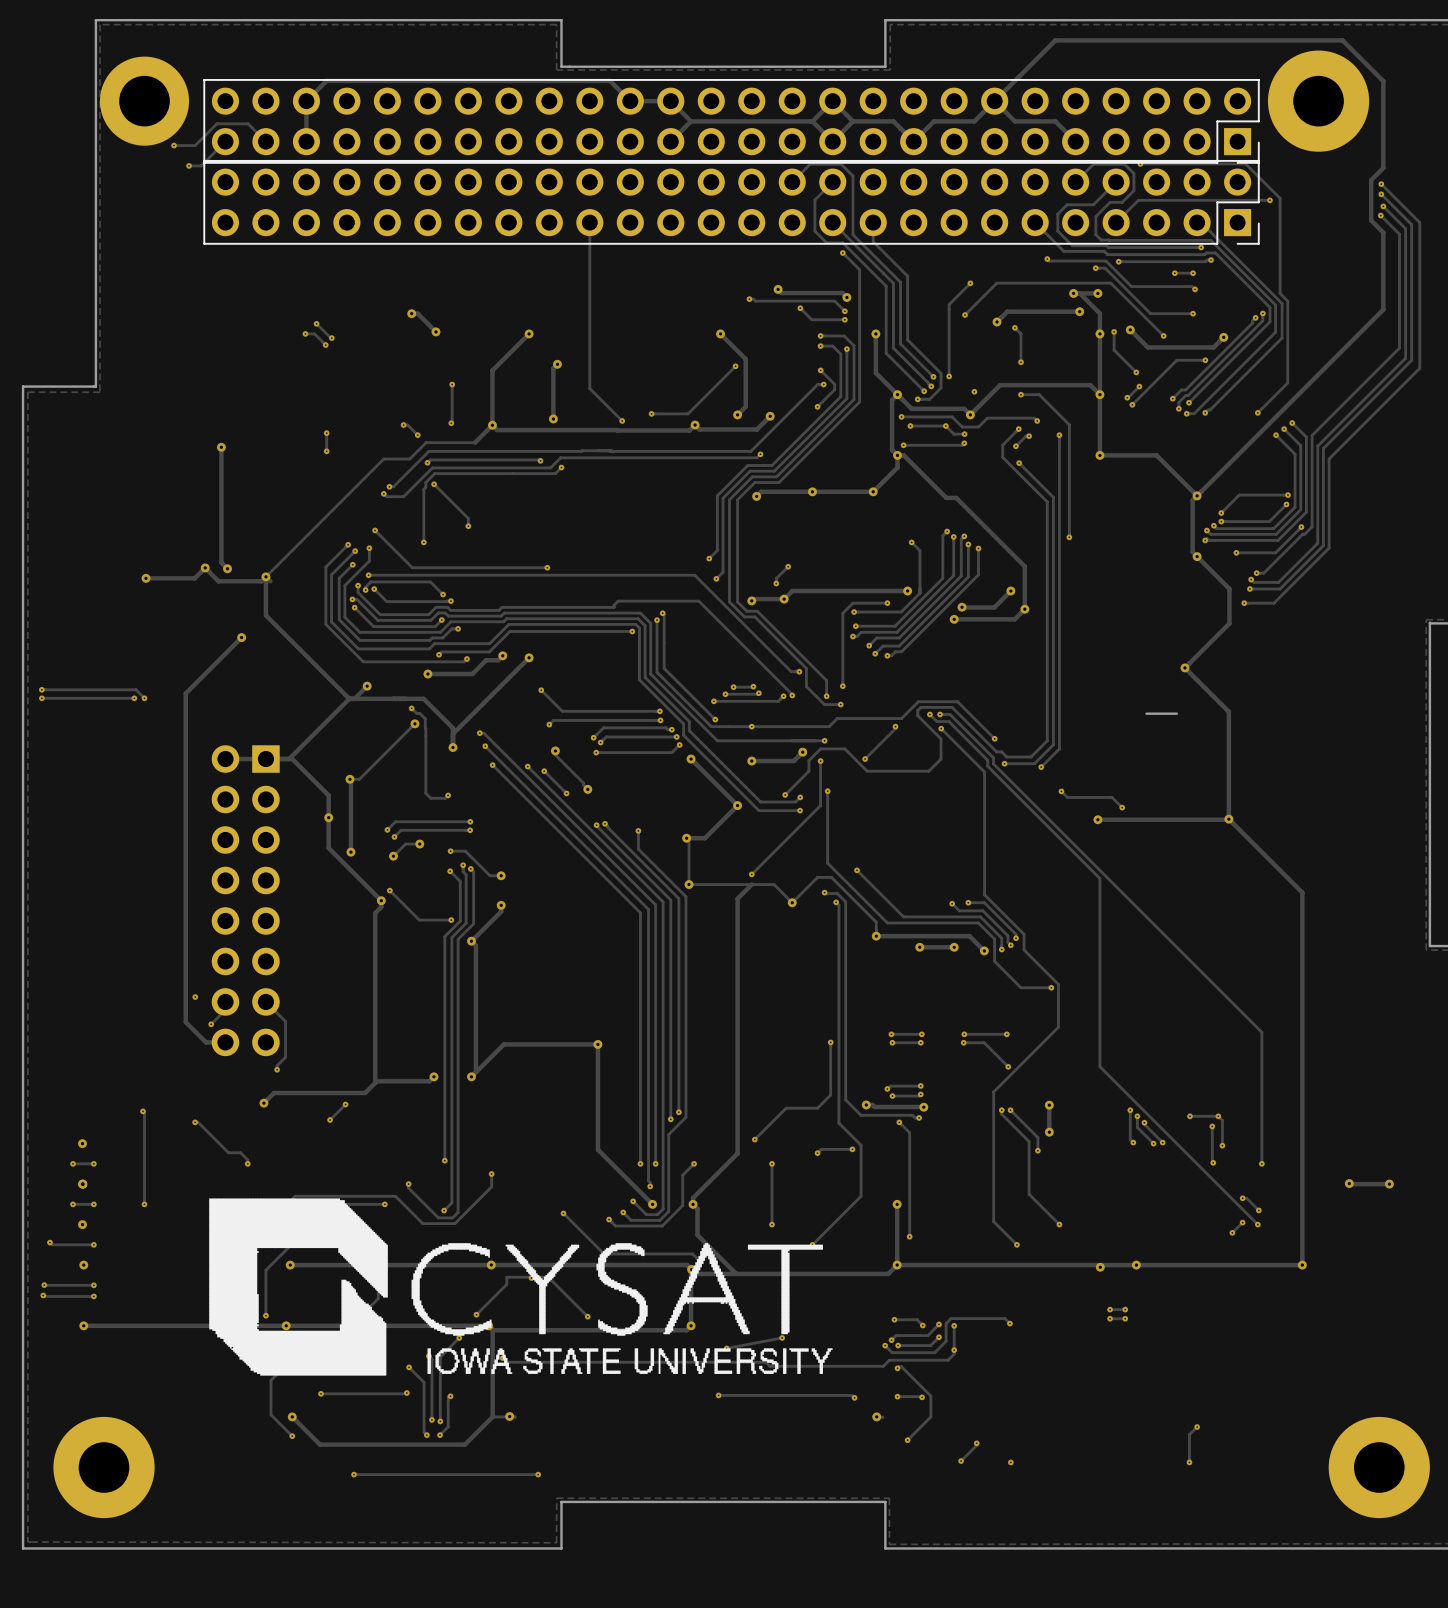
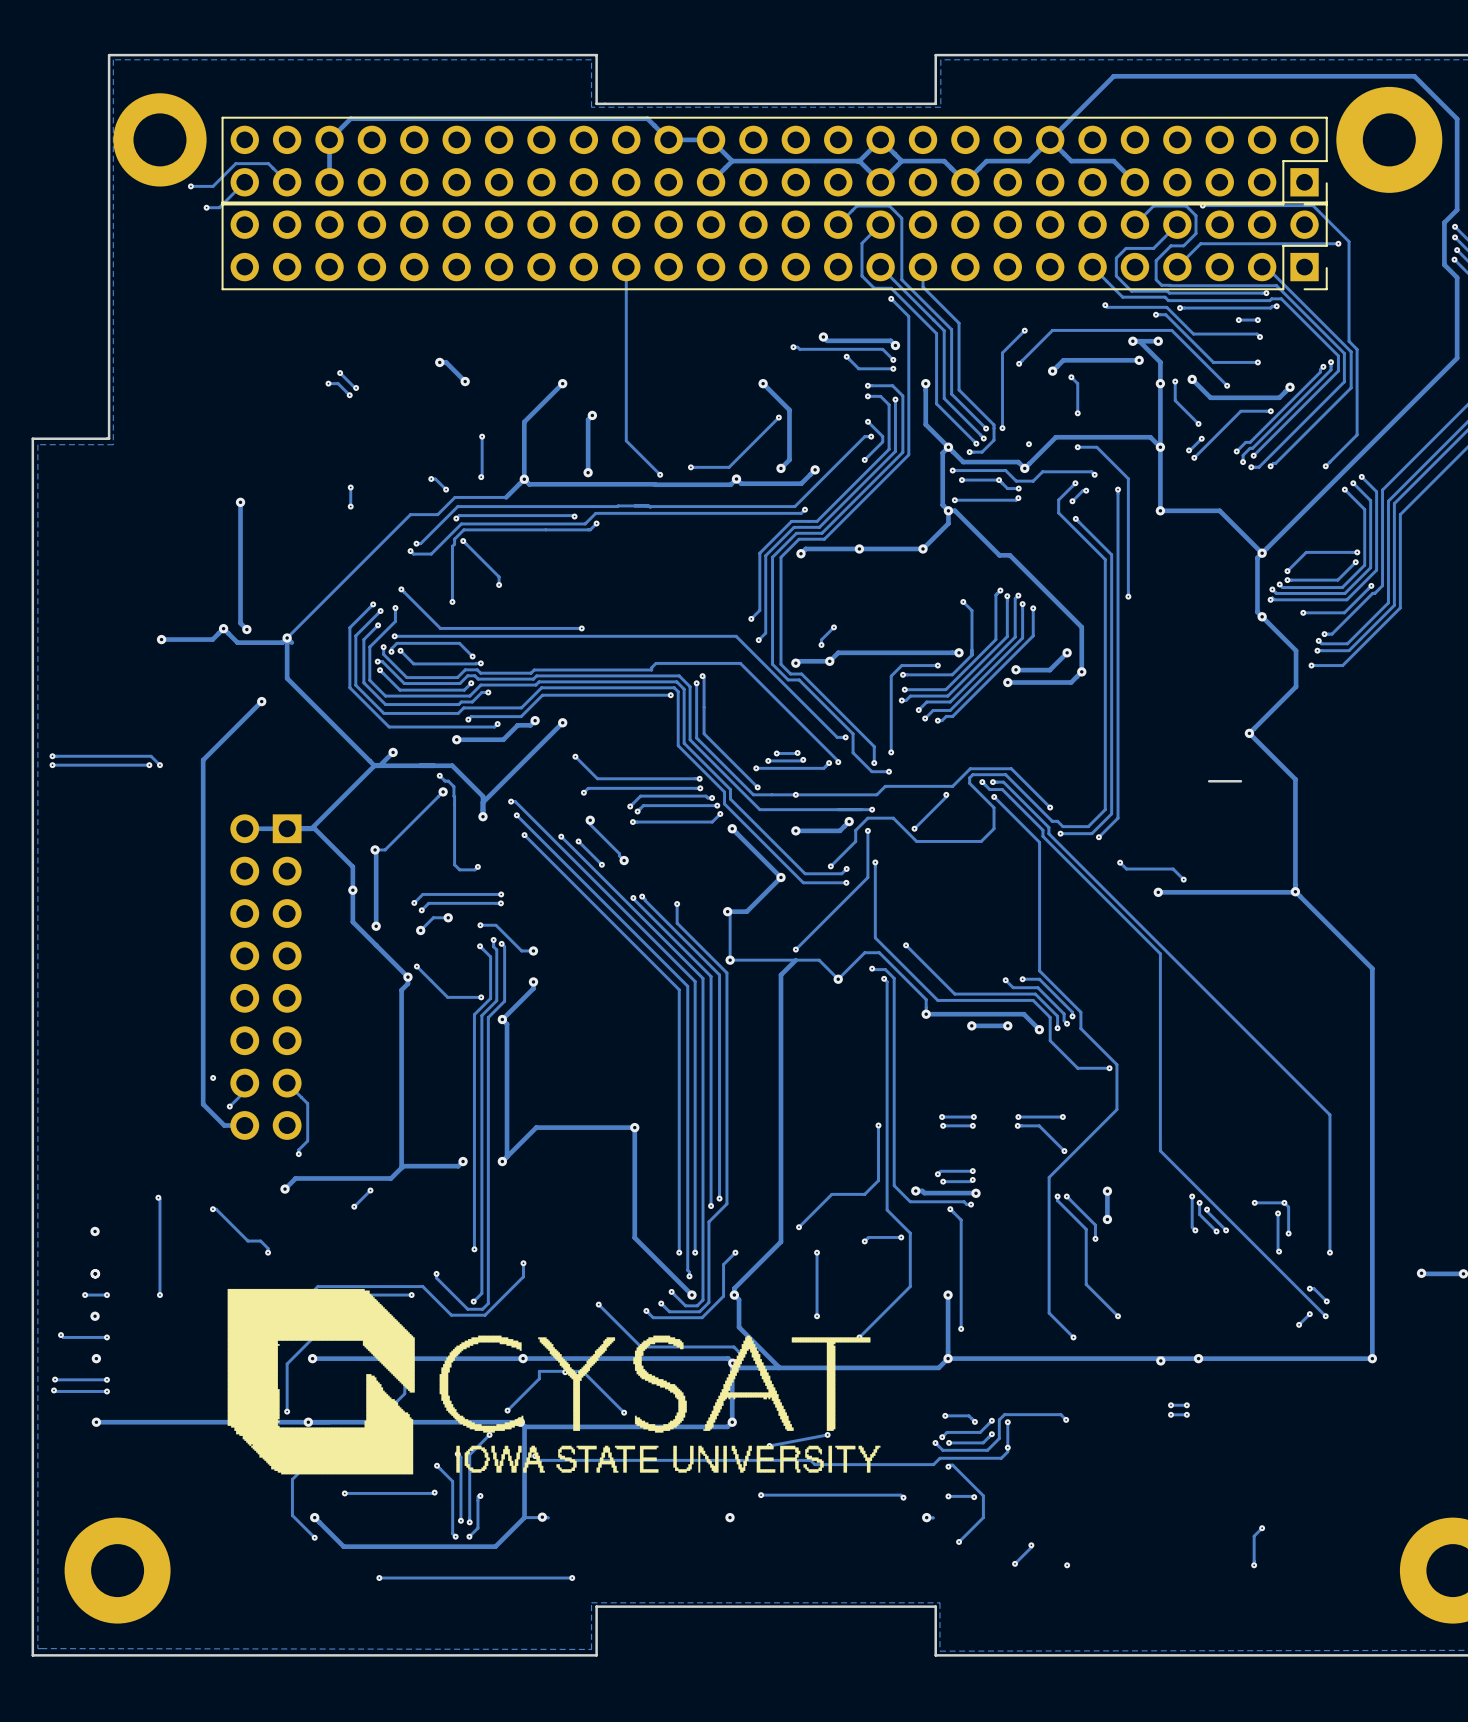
via: (72, 1163) -> none
track: (93, 1163) (72, 1163) -> none
via: (93, 1163) -> none
via: none -> (730, 1517)

